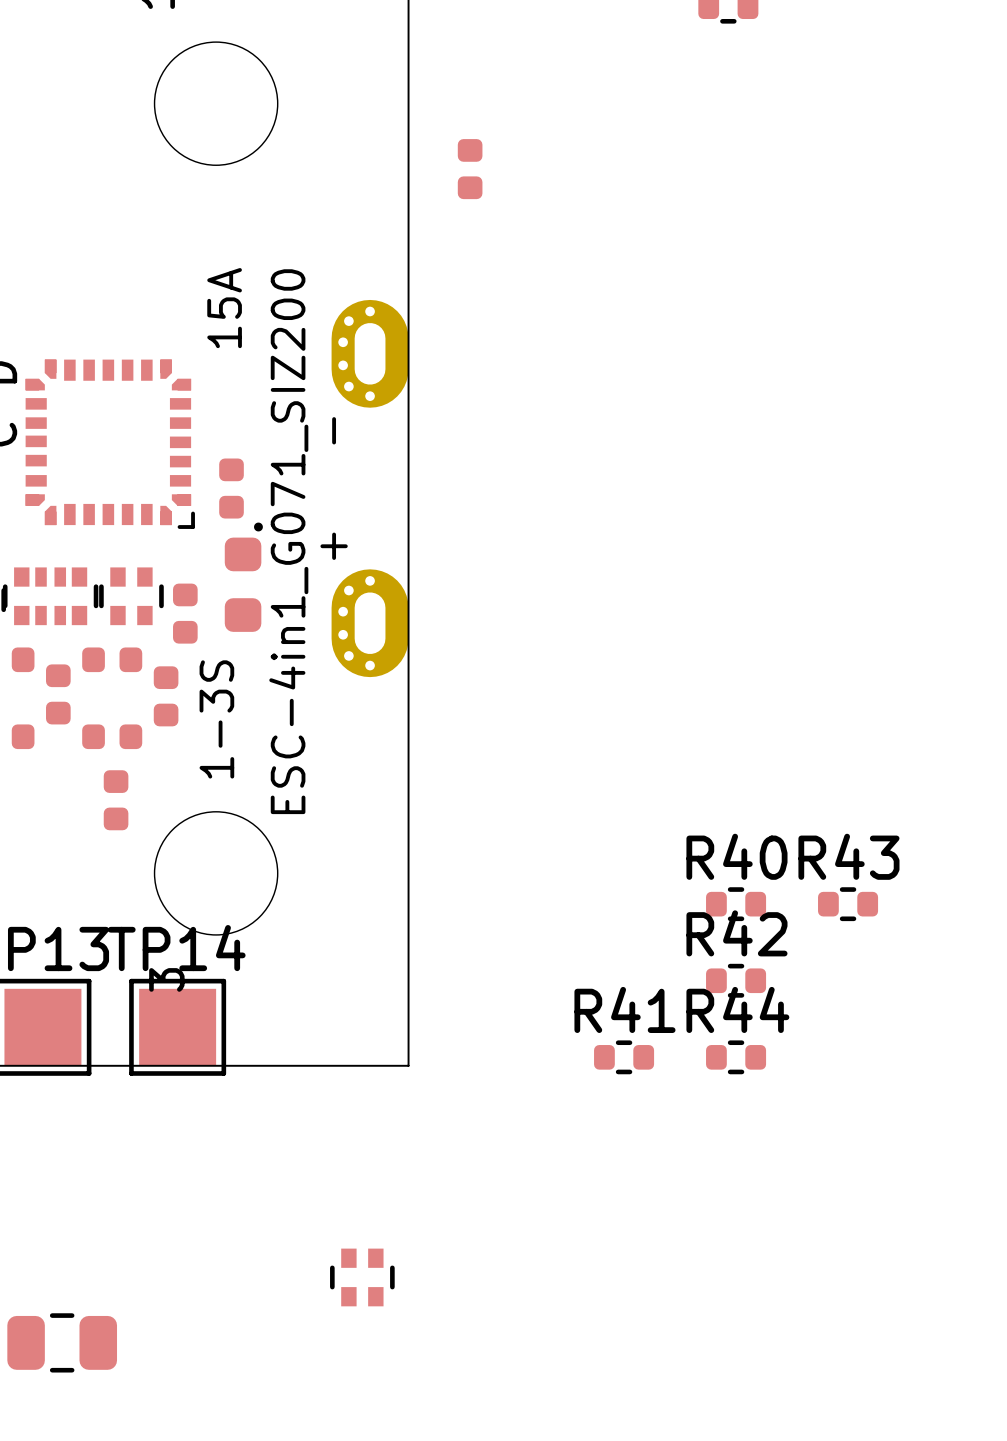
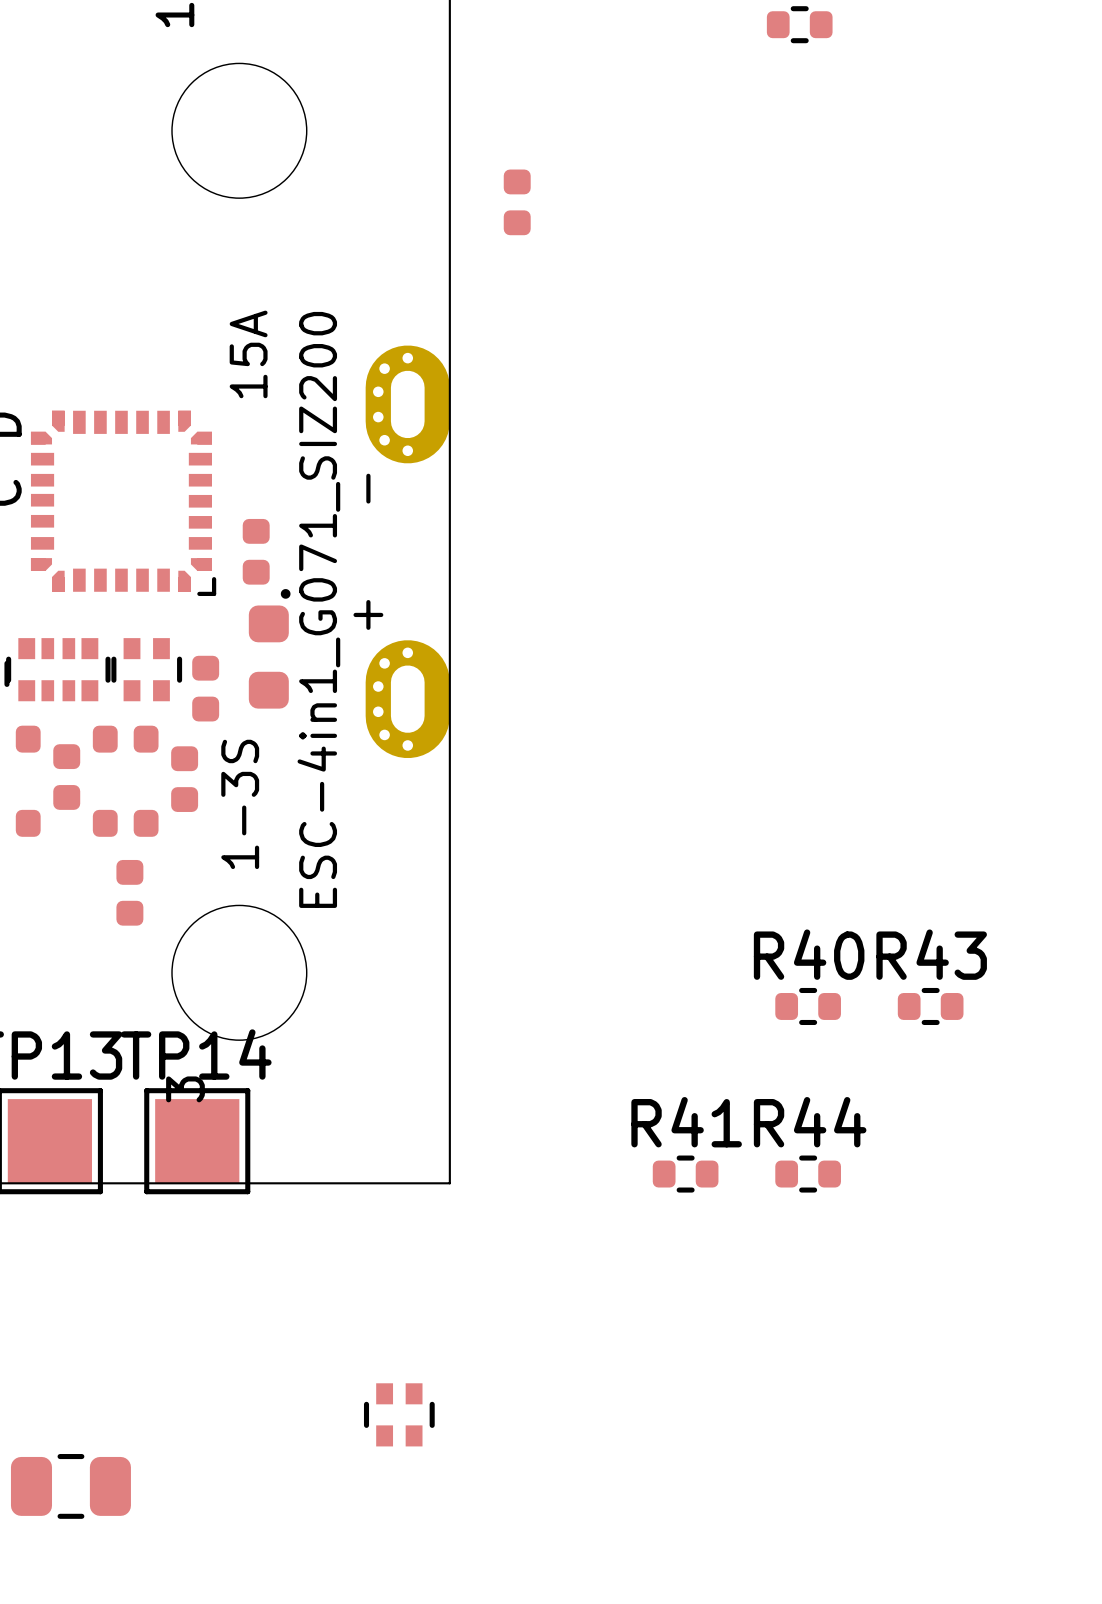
R42: (736, 980) -> none

